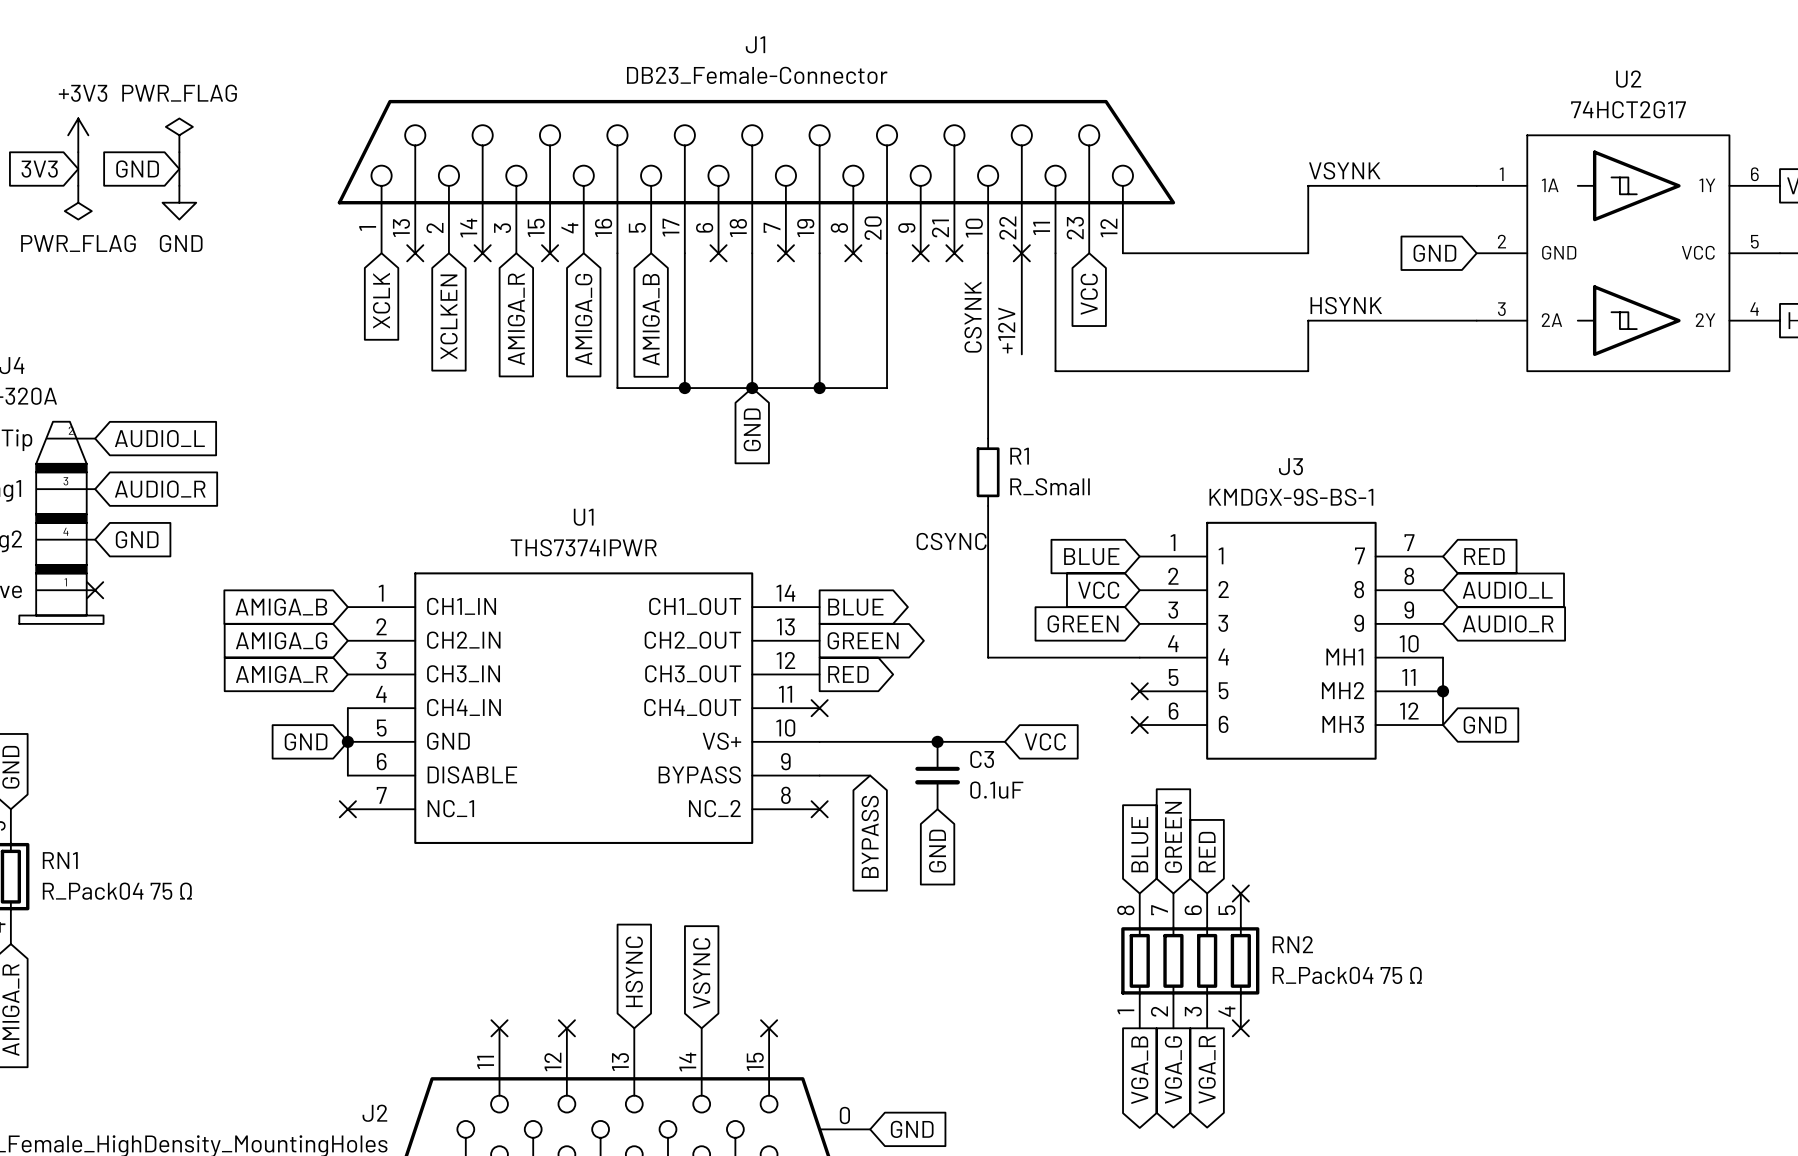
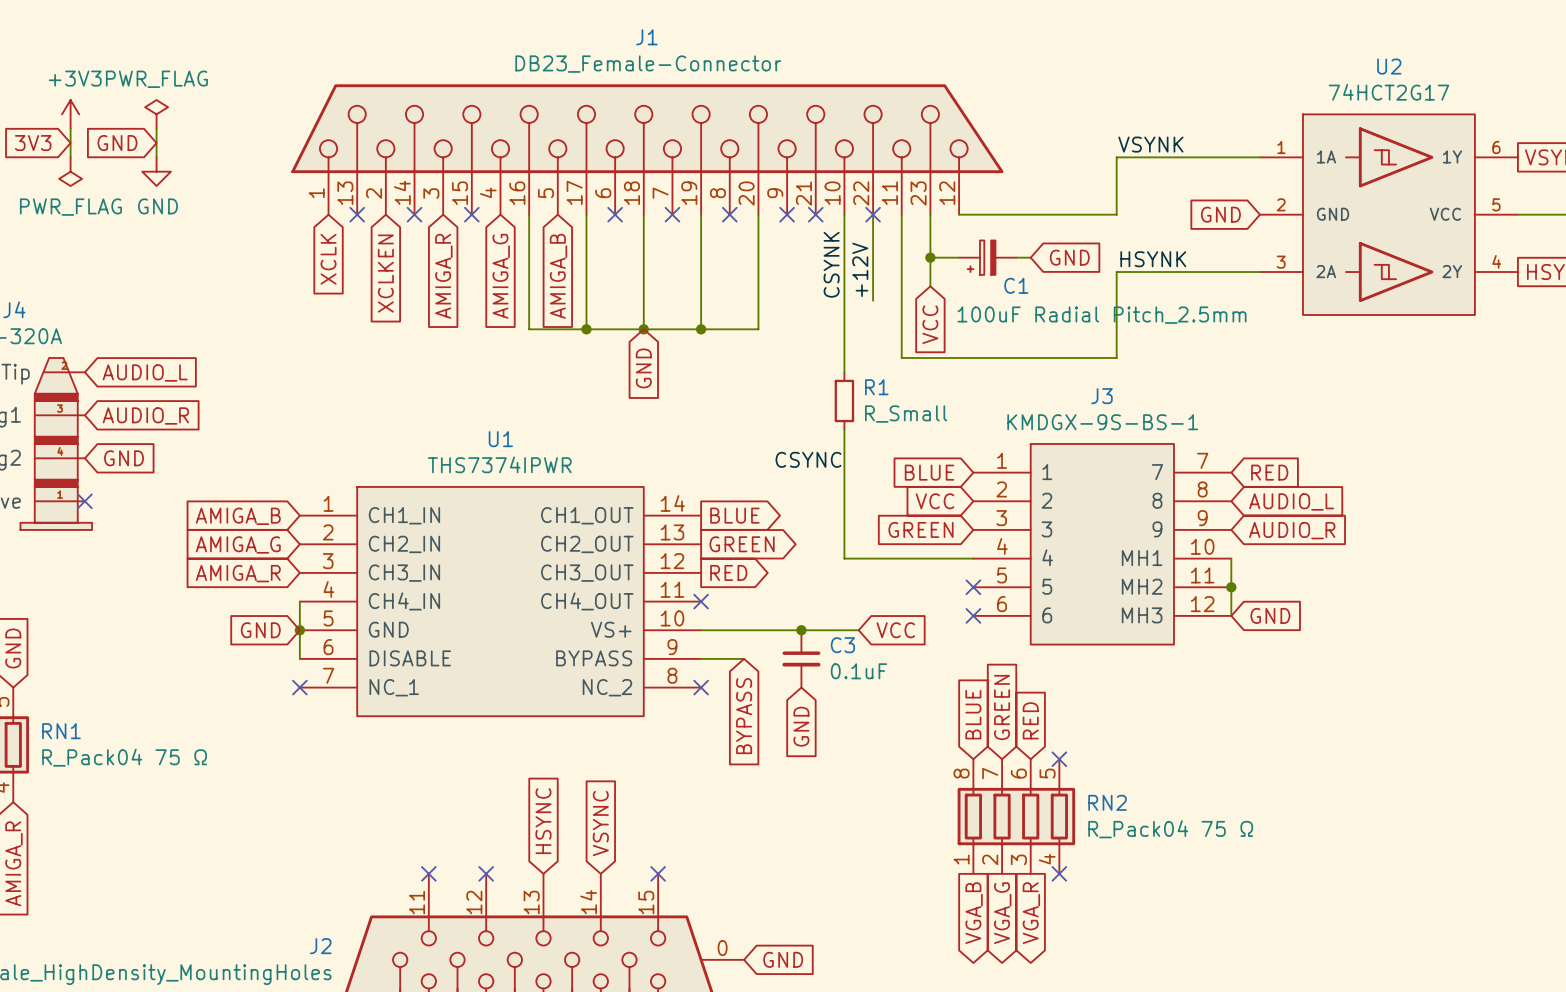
wire: none -> (930, 214) (930, 286)
global label position: VCC (1089, 294) -> VCC (930, 324)
wire: none -> (930, 257) (959, 257)
junction: none -> (930, 257)
C1: none -> 100uF Radial Pitch_2.5mm (987, 257)
wire: none -> (1016, 257) (1030, 257)
global label: none -> GND (1069, 257)
wire: (1055, 371) (1308, 371) -> (901, 315) (901, 357) (1116, 357) (1116, 315)

